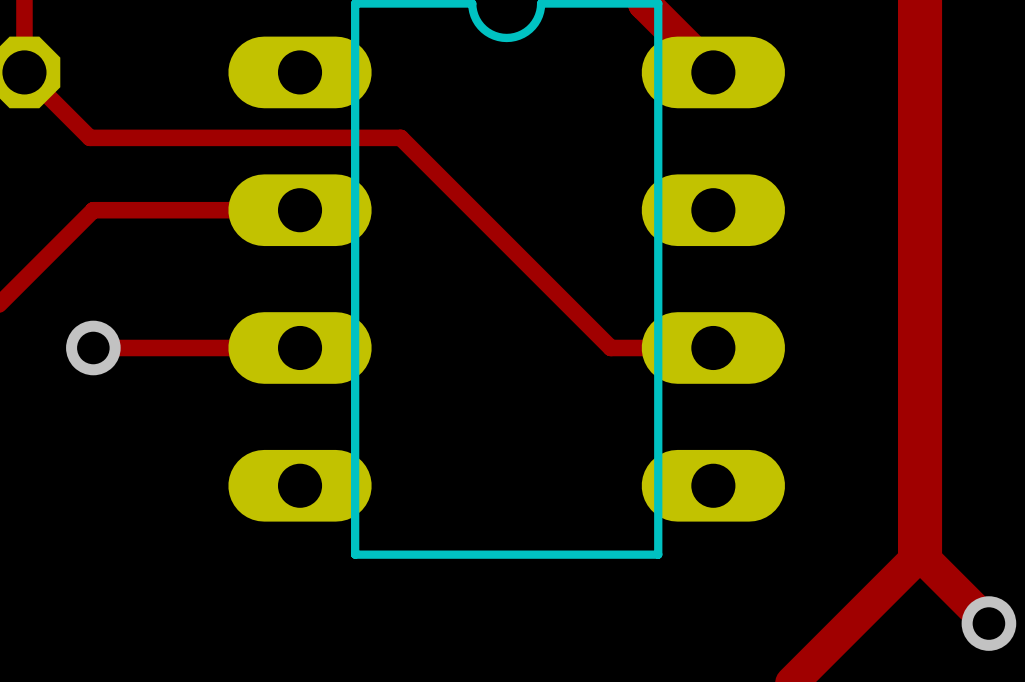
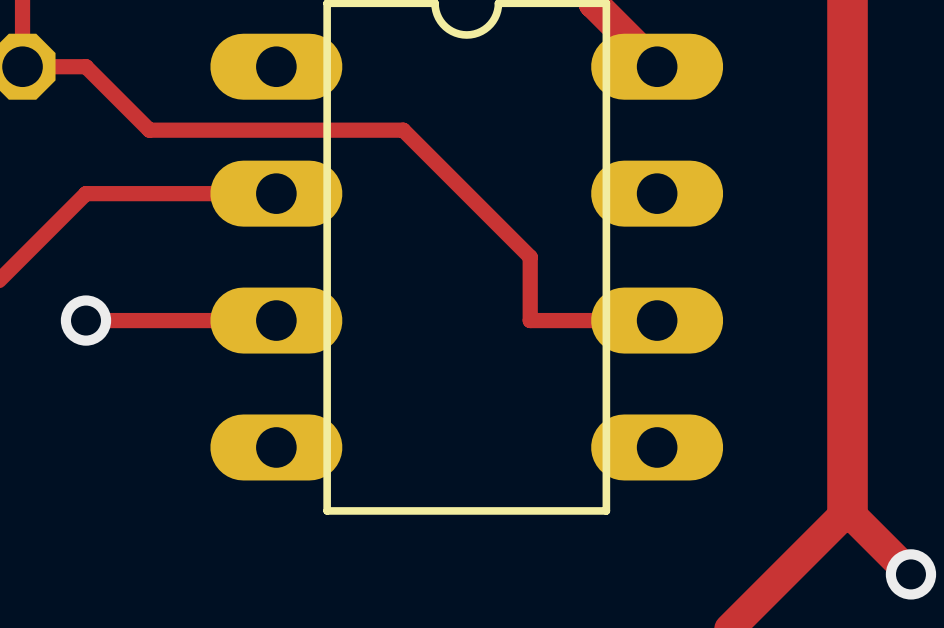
track: (24, 72) (89, 137) (400, 137) (610, 347) -> (22, 66) (85, 66) (149, 130) (403, 130) (530, 257) (530, 320) (562, 320)

